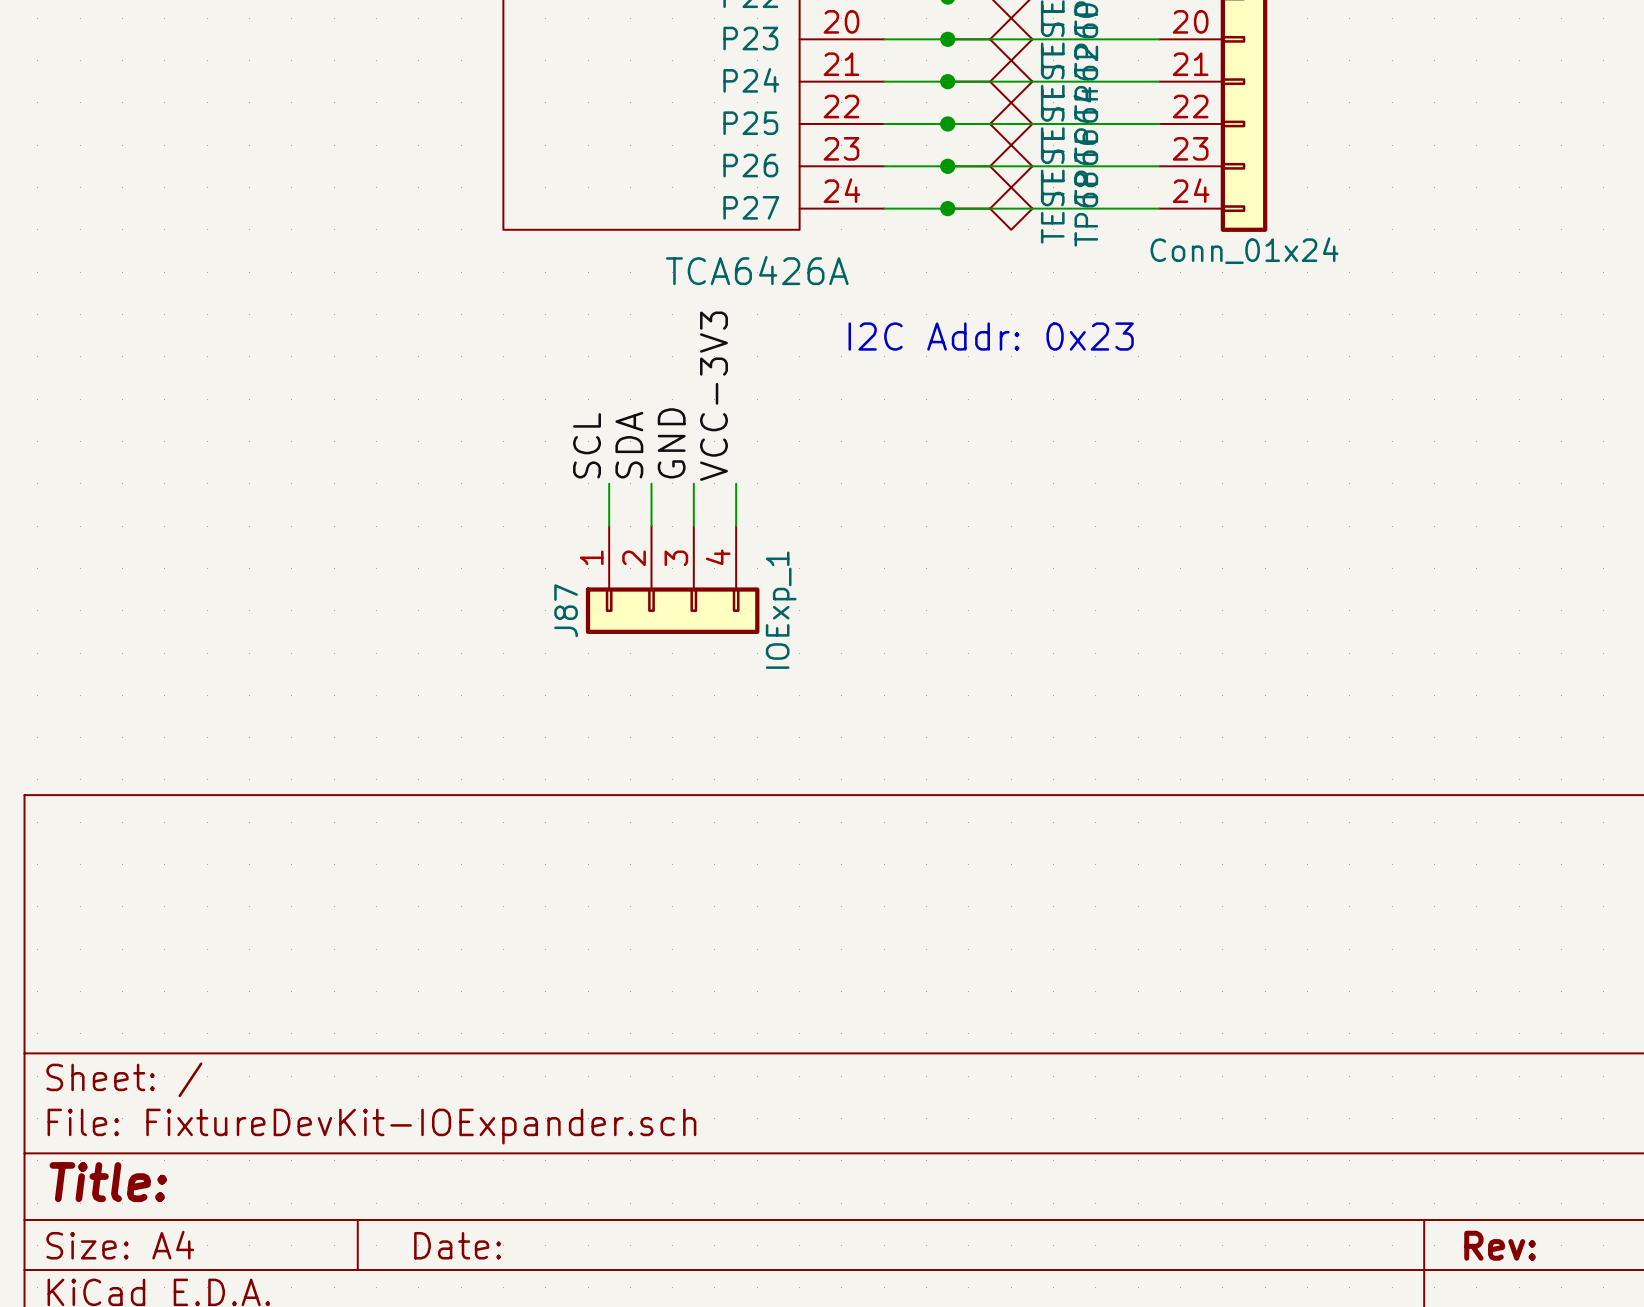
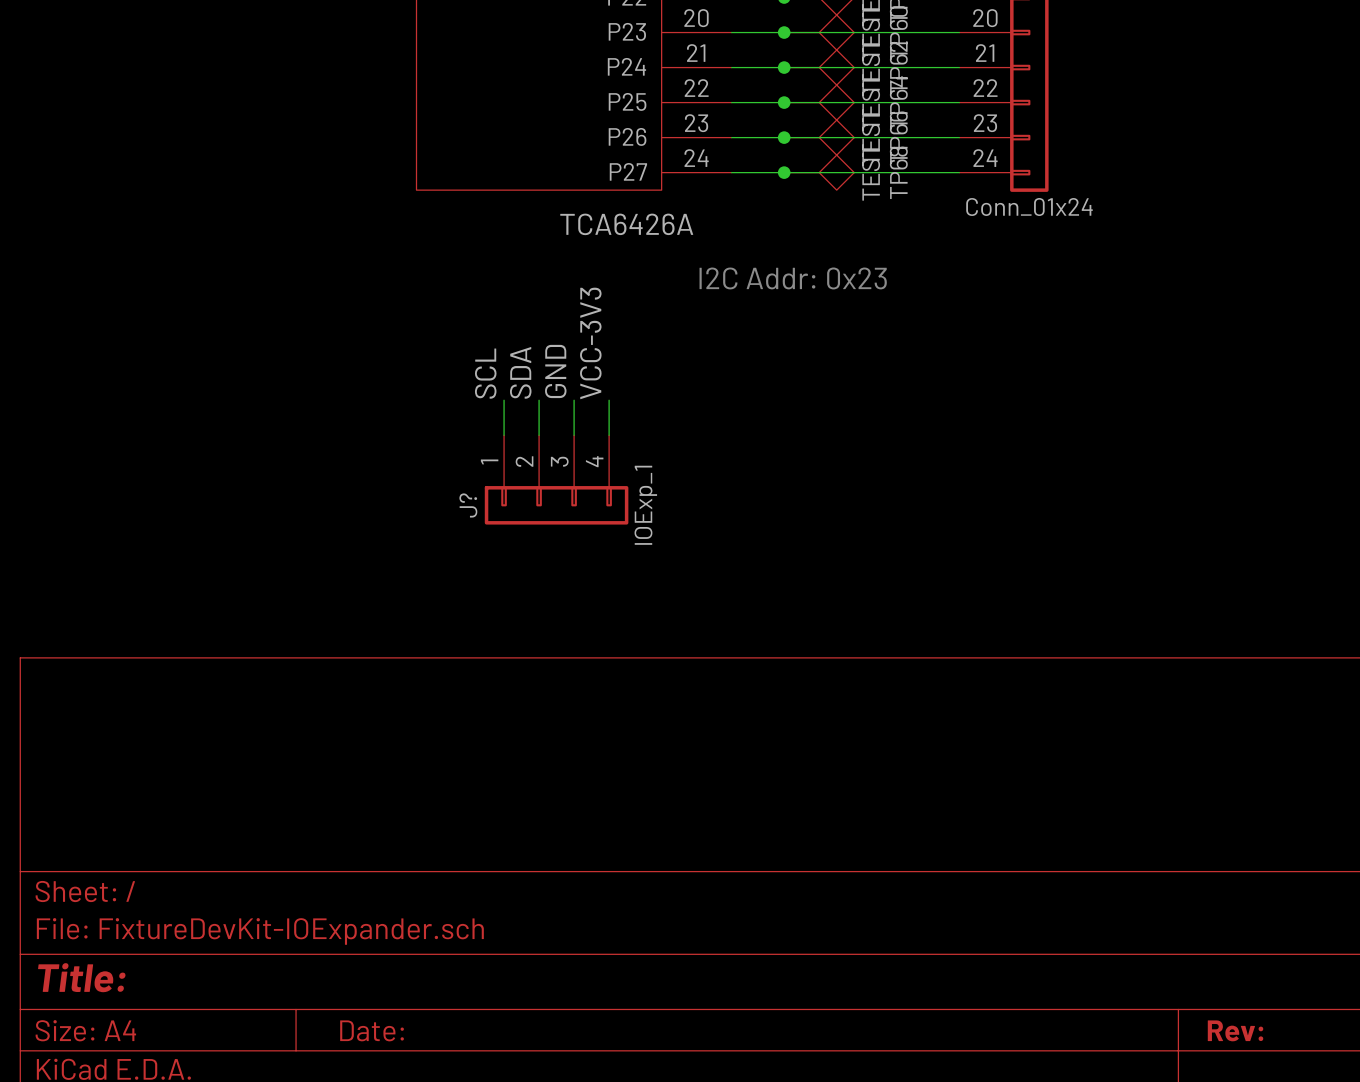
J87 name: J87 (566, 610) -> J? (468, 505)

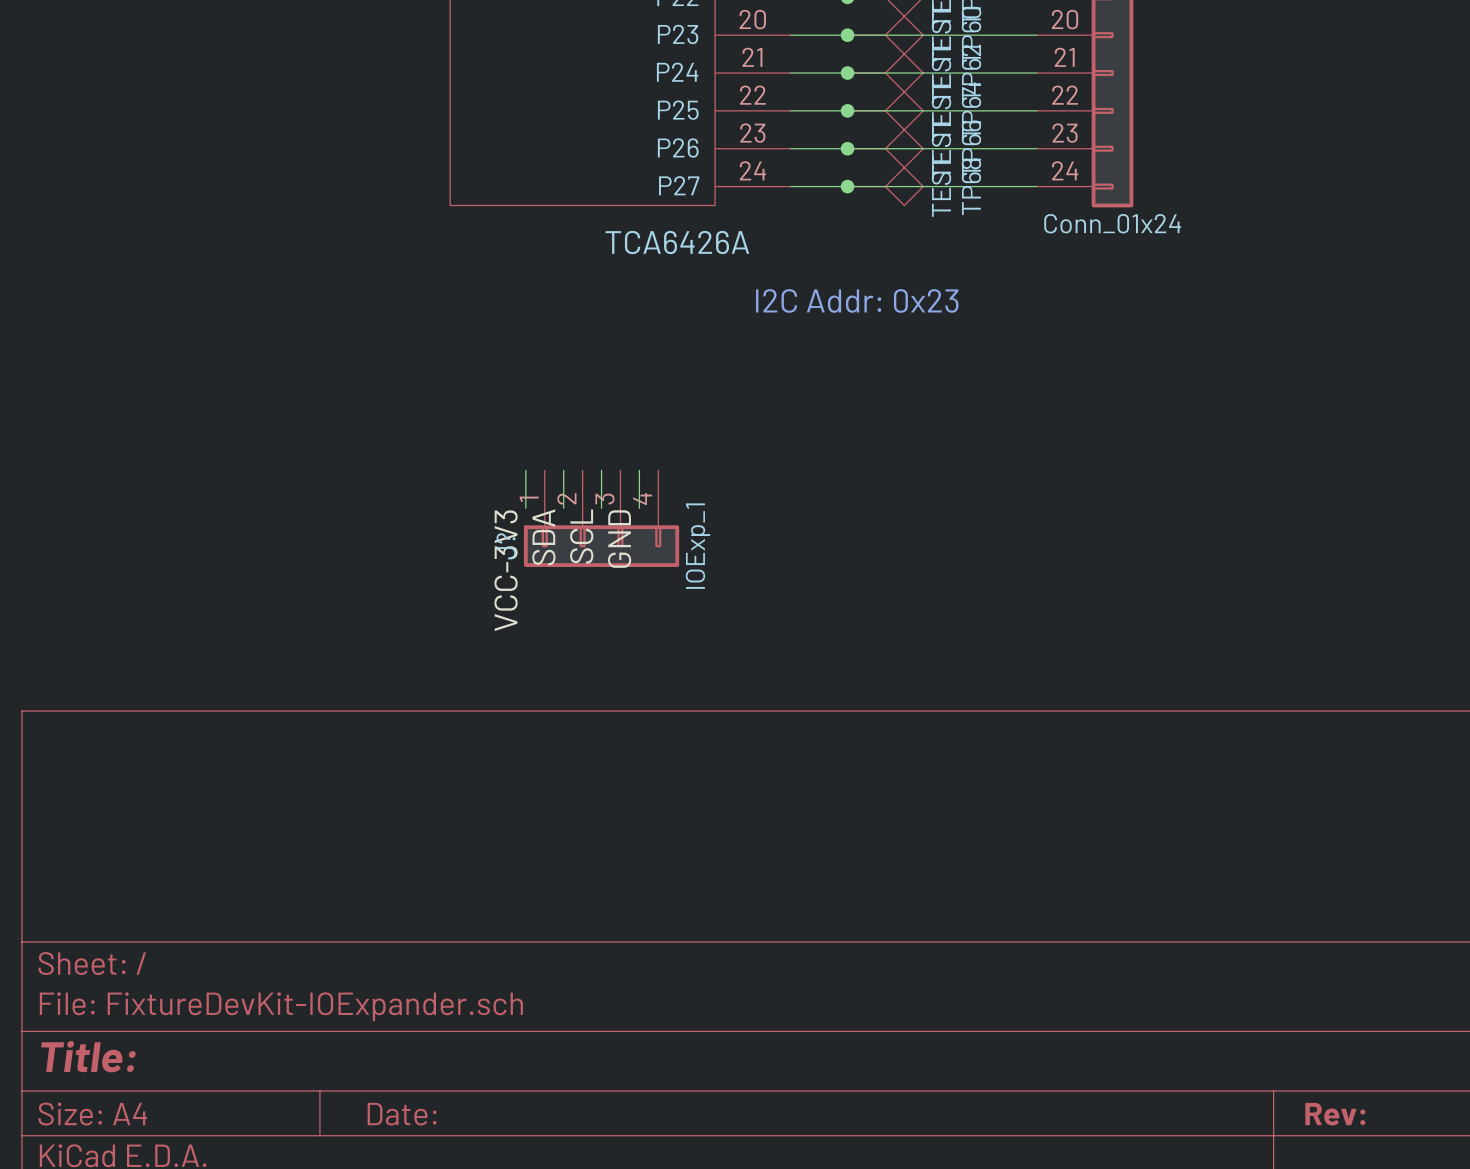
label position: VCC-3V3 (590, 343) -> VCC-3V3 (506, 570)
label position: GND (555, 371) -> GND (619, 539)
label position: SDA (520, 372) -> SDA (543, 537)
label position: SCL (485, 373) -> SCL (581, 536)
wire: (504, 400) (504, 435) -> (525, 470) (525, 508)
wire: (539, 400) (539, 435) -> (563, 470) (563, 508)
wire: (574, 400) (574, 435) -> (601, 470) (601, 508)
wire: (609, 400) (609, 435) -> (639, 470) (639, 508)

